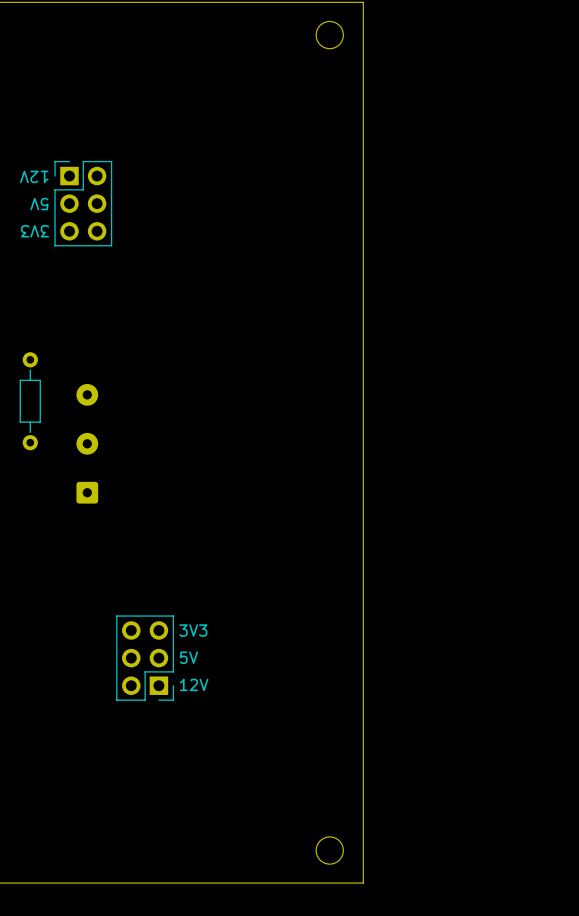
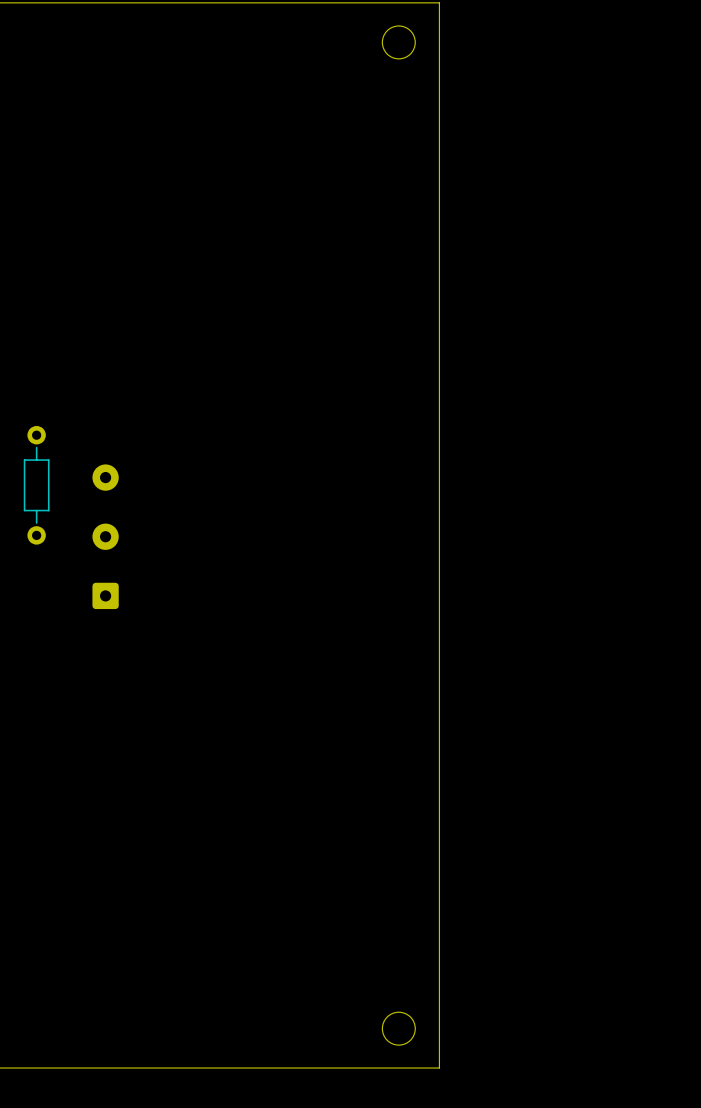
text: 12V (34, 176) -> none
part: (83, 203) -> none
text: 5V (39, 204) -> none
text: 3V3 (35, 231) -> none
text: 3V3 (193, 630) -> none
text: 5V (188, 657) -> none
part: (145, 658) -> none
text: 12V (194, 684) -> none

